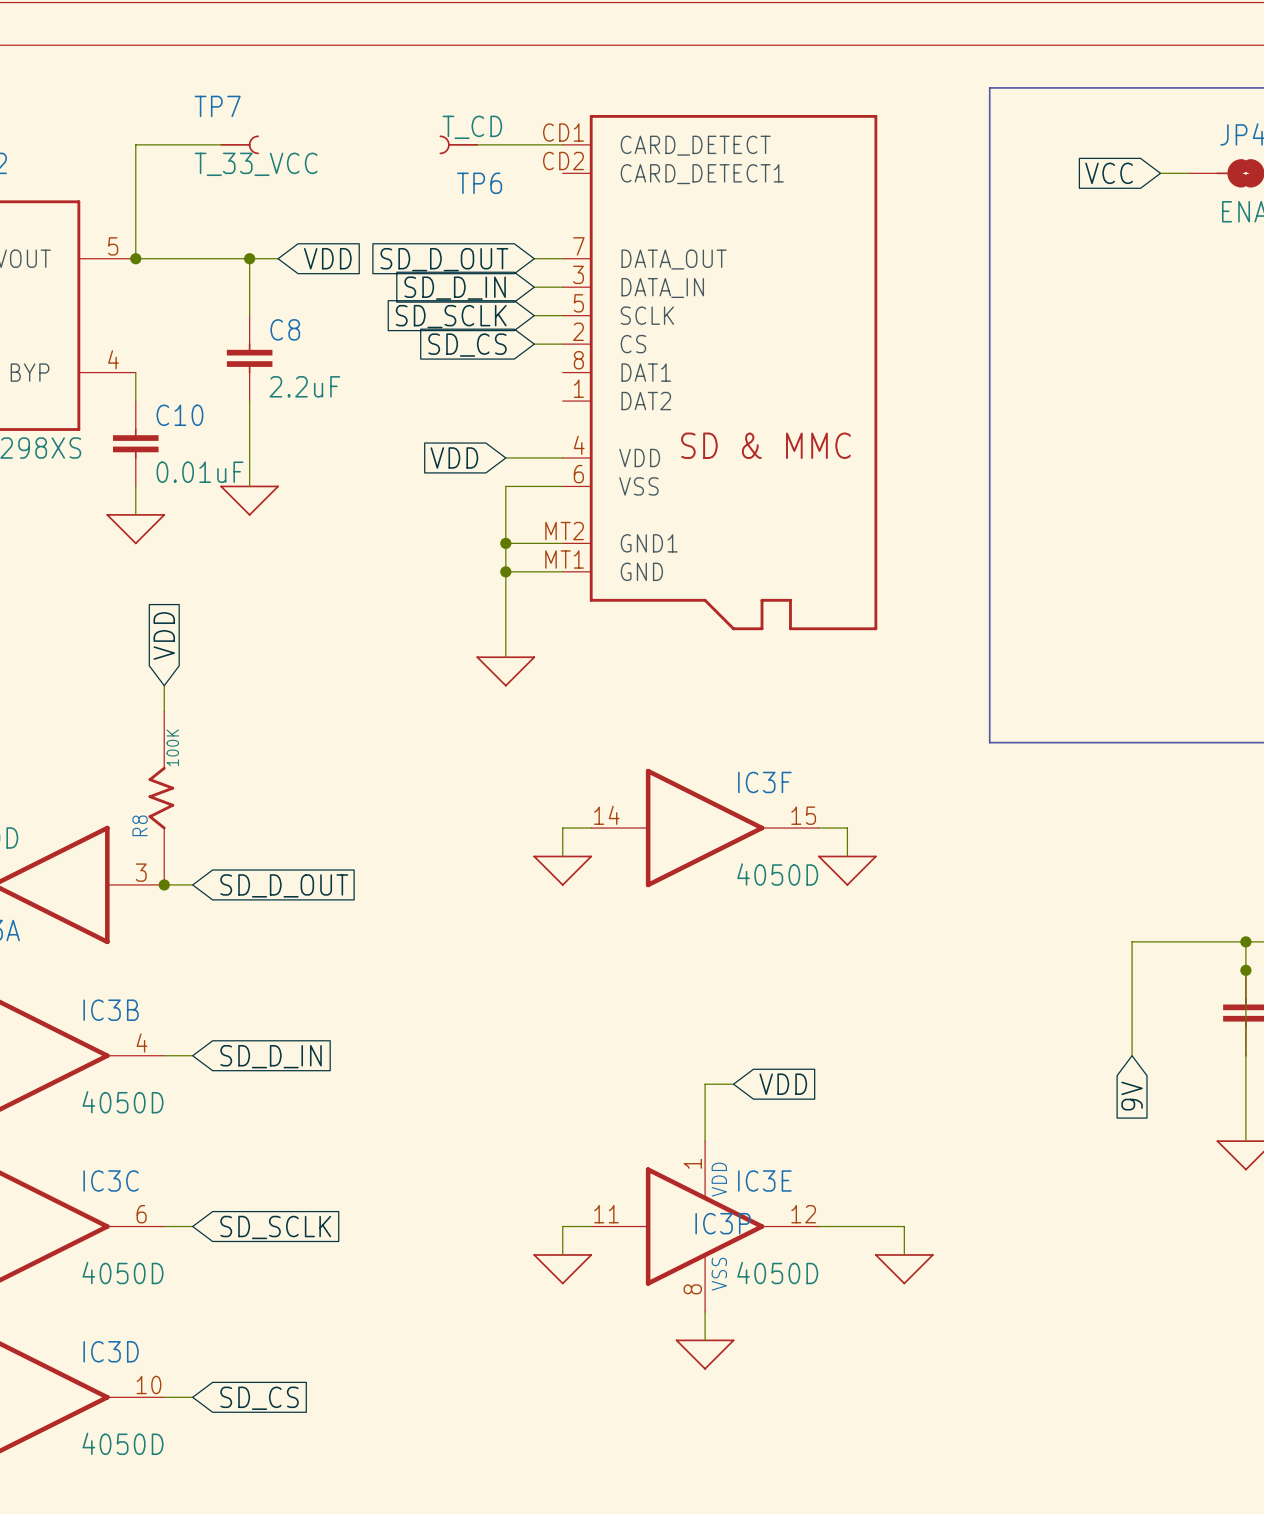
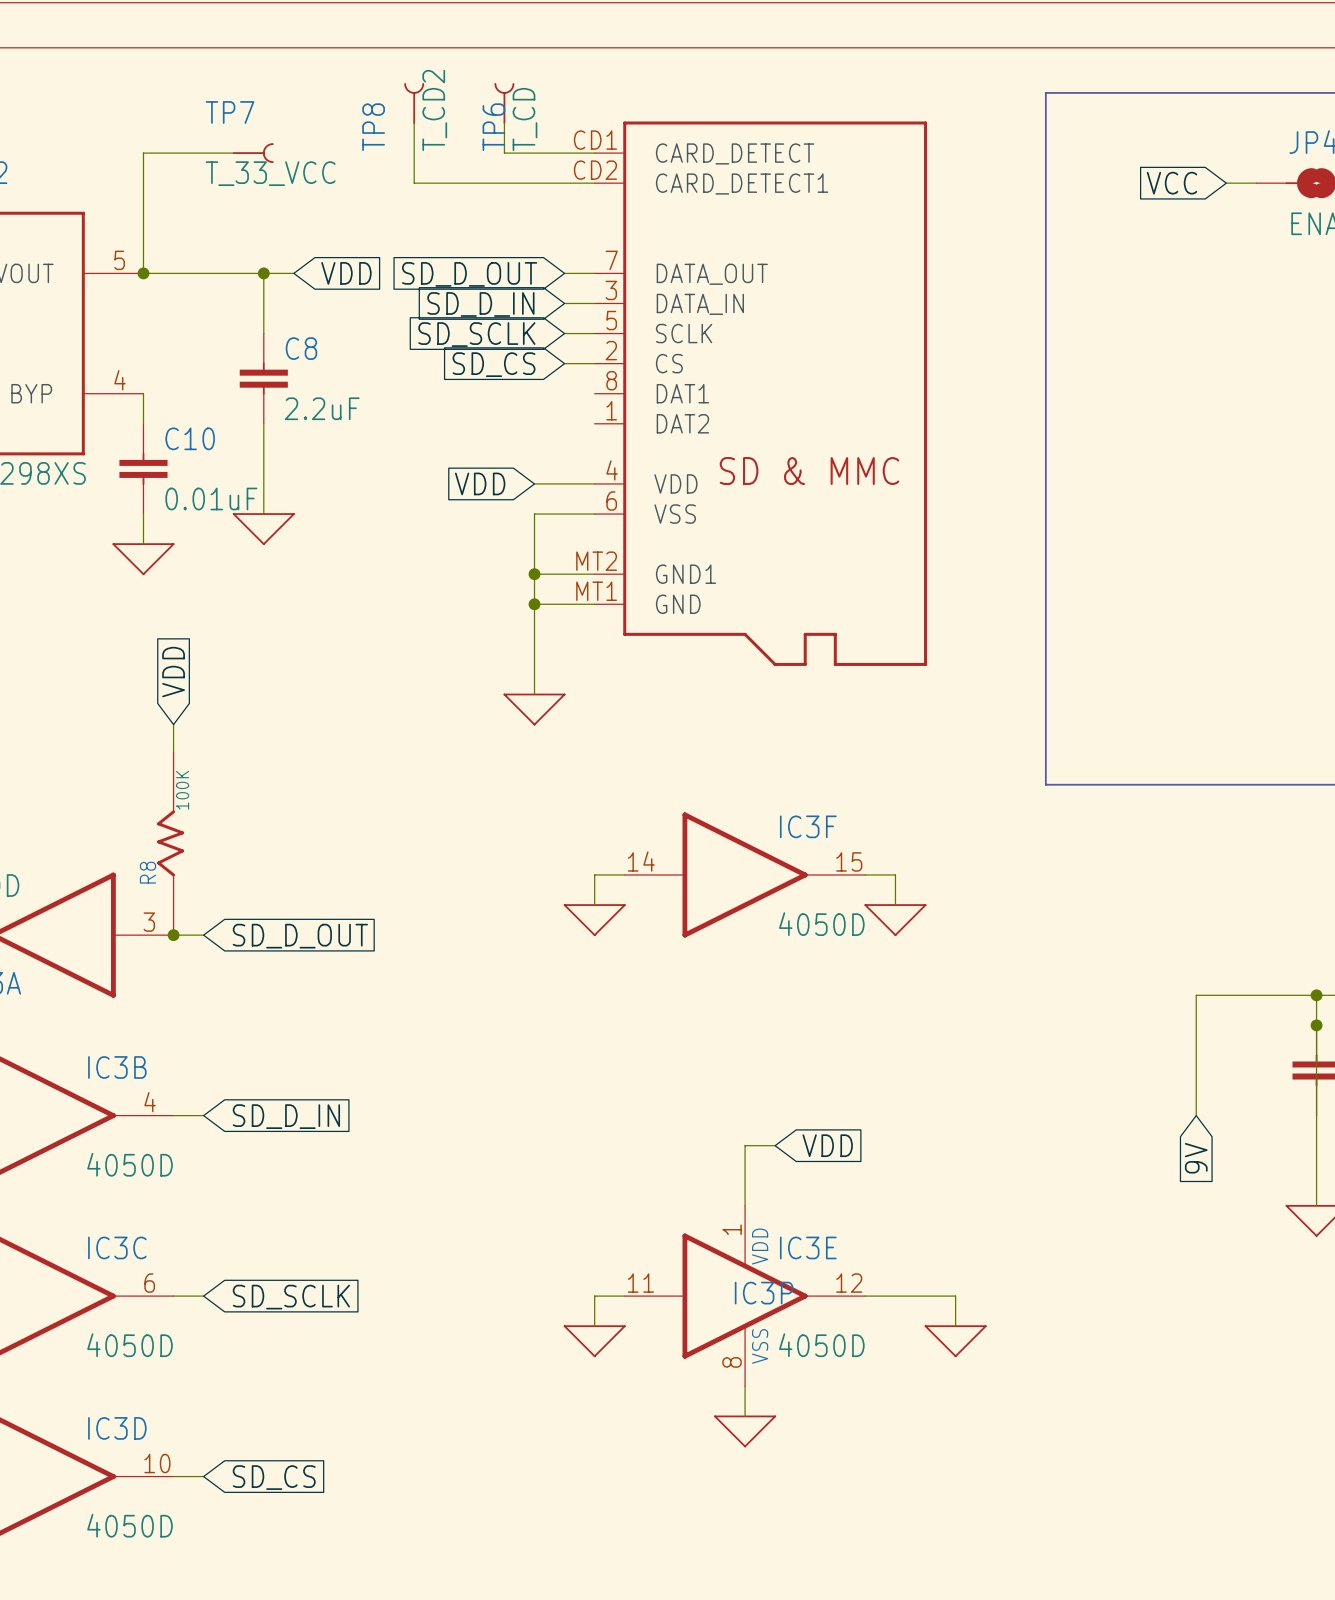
TP8: none -> T_CD2 (414, 103)
wire: none -> (414, 123) (414, 183) (594, 183)
wire: none -> (504, 123) (504, 153)
TP6 rotation: 0° (458, 144) -> 90° clockwise (504, 103)
TP6 position: (458, 144) -> (504, 103)
TP6 name position: TP6 (479, 183) -> TP6 (493, 127)

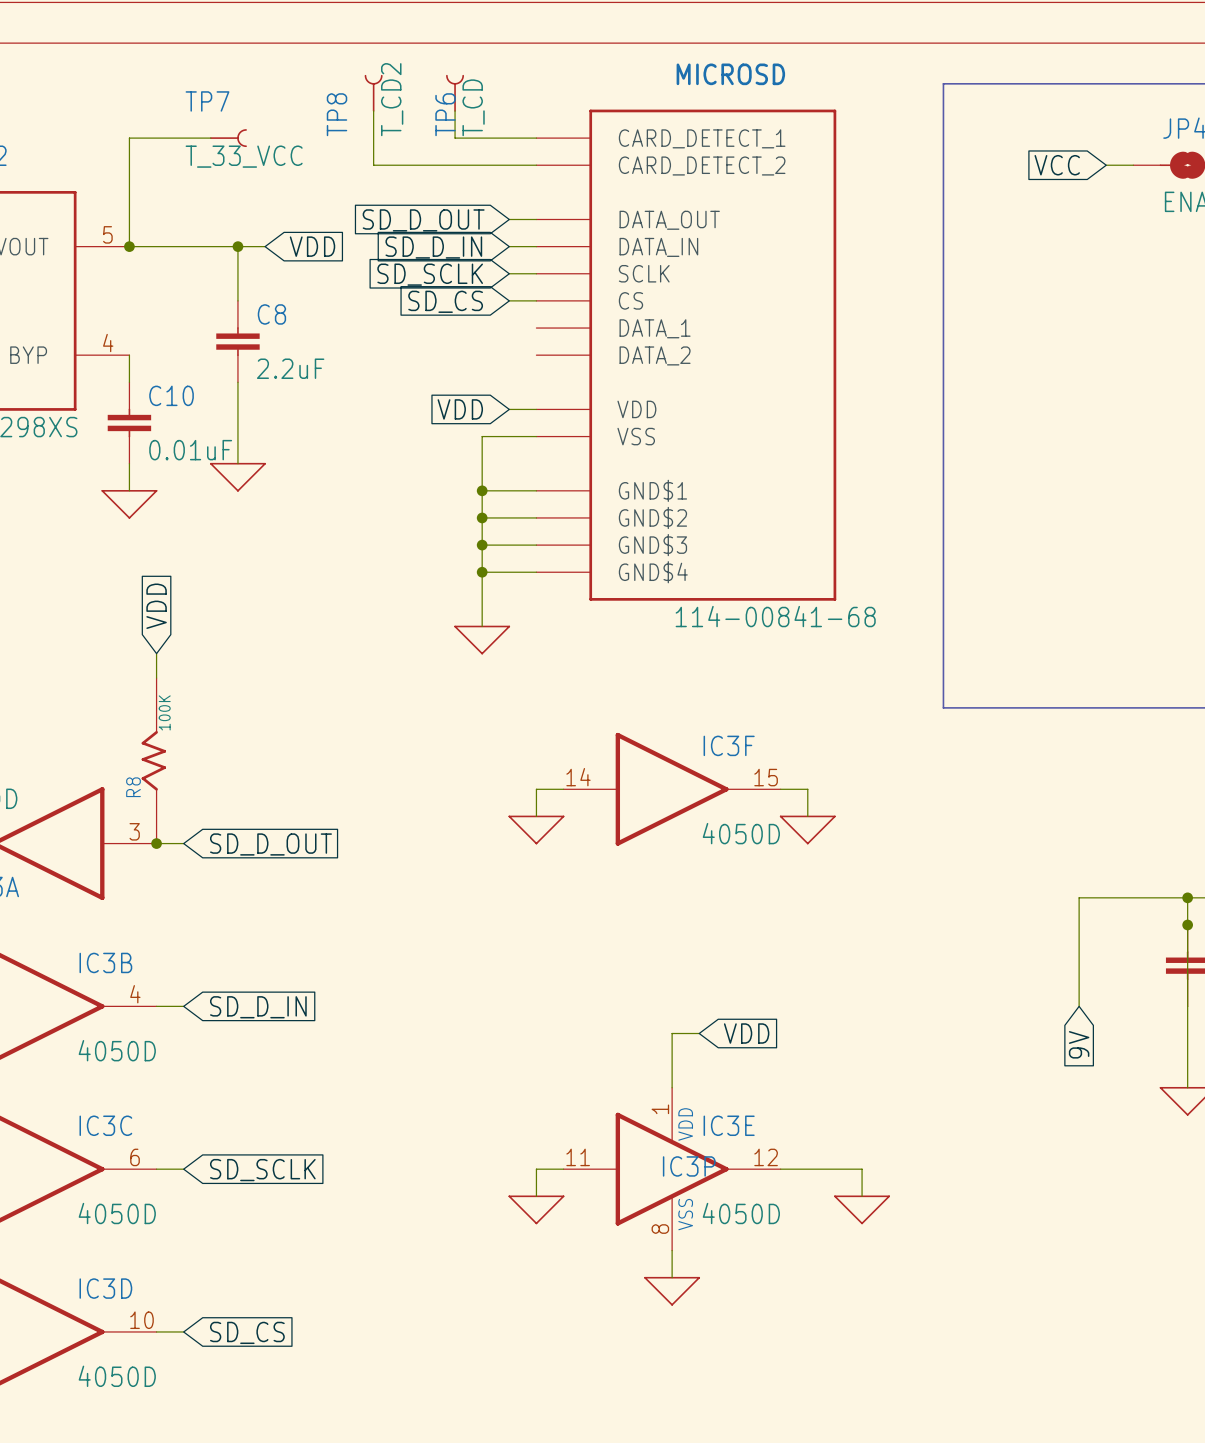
wire: none -> (509, 219) (536, 219)
global label: none -> SD_D_OUT (423, 220)
global label: SD_D_OUT (469, 274) -> SD_D_IN (433, 247)
global label: SD_D_IN (480, 304) -> SD_SCLK (430, 274)
global label: SD_SCLK (476, 334) -> SD_CS (445, 301)
wire: (564, 363) (594, 363) -> (509, 409) (536, 409)
global label: SD_CS (494, 364) -> none
part: (760, 393) -> none
MICROSD: none -> 114-00841-68 (686, 355)
global label position: VDD (480, 483) -> VDD (460, 409)
wire: (534, 514) (594, 514) -> (482, 463) (482, 436)
wire: none -> (482, 490) (536, 490)
junction: none -> (482, 490)
wire: none -> (482, 572) (536, 572)
junction: none -> (482, 572)

